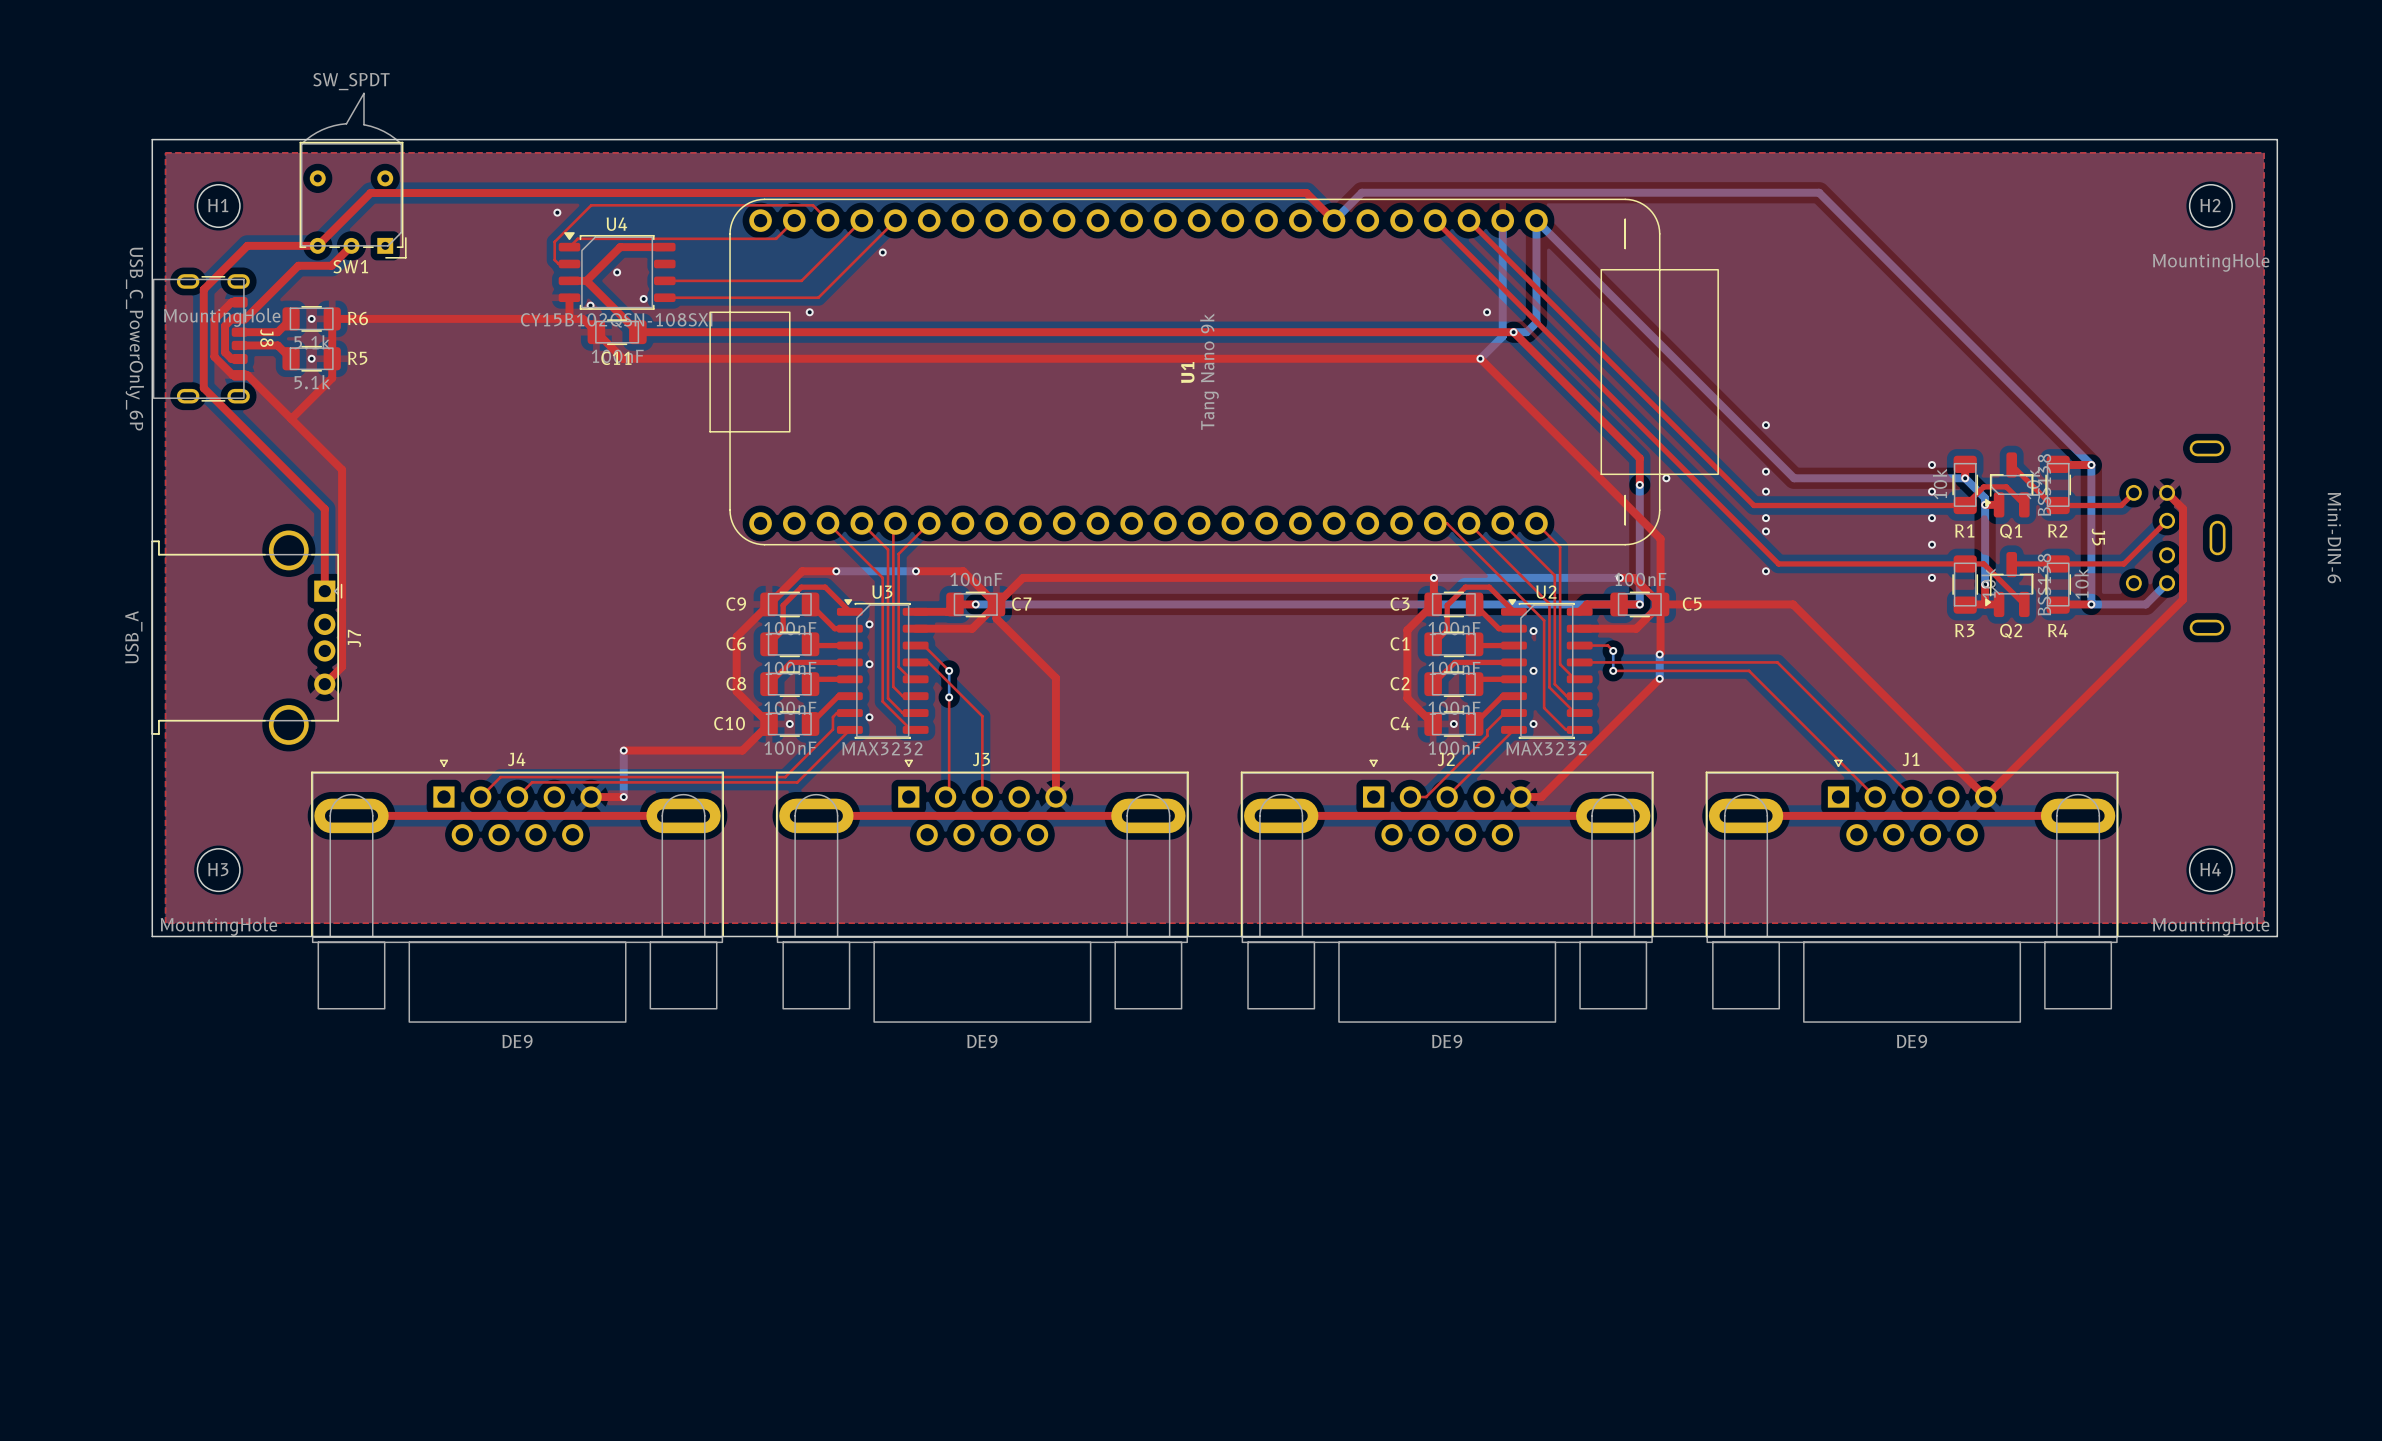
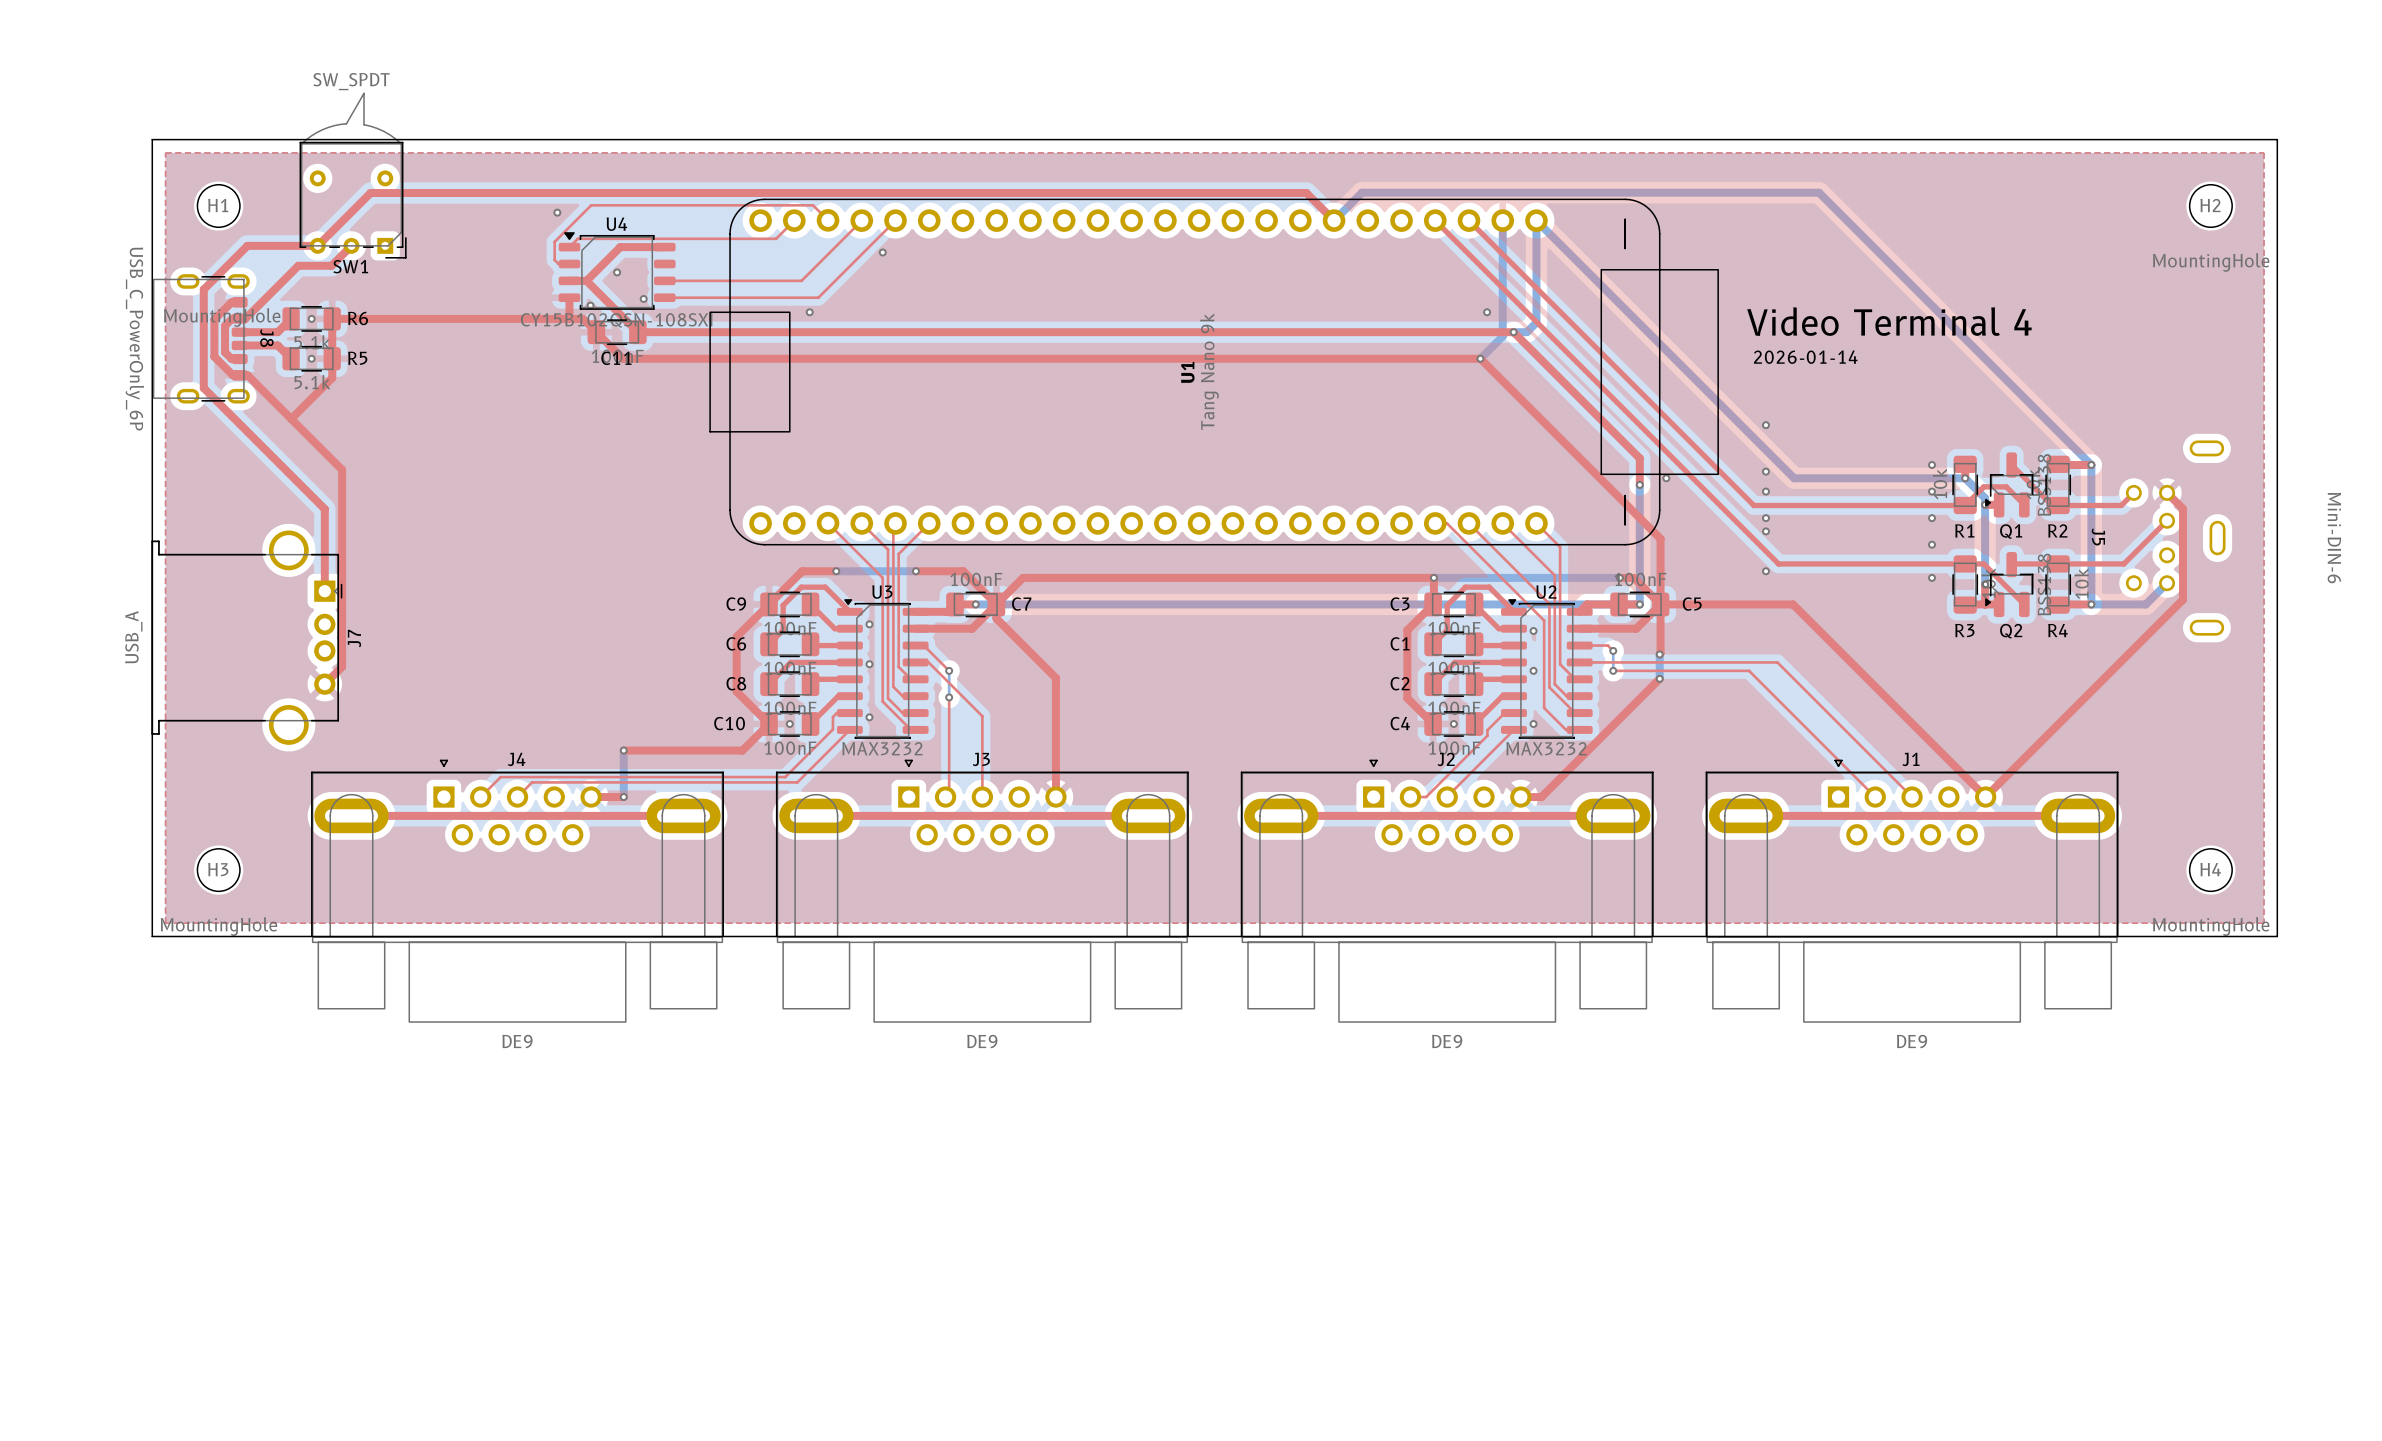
text: none -> Video Terminal 4 (1889, 321)
text: none -> 2026-01-14 (1805, 357)

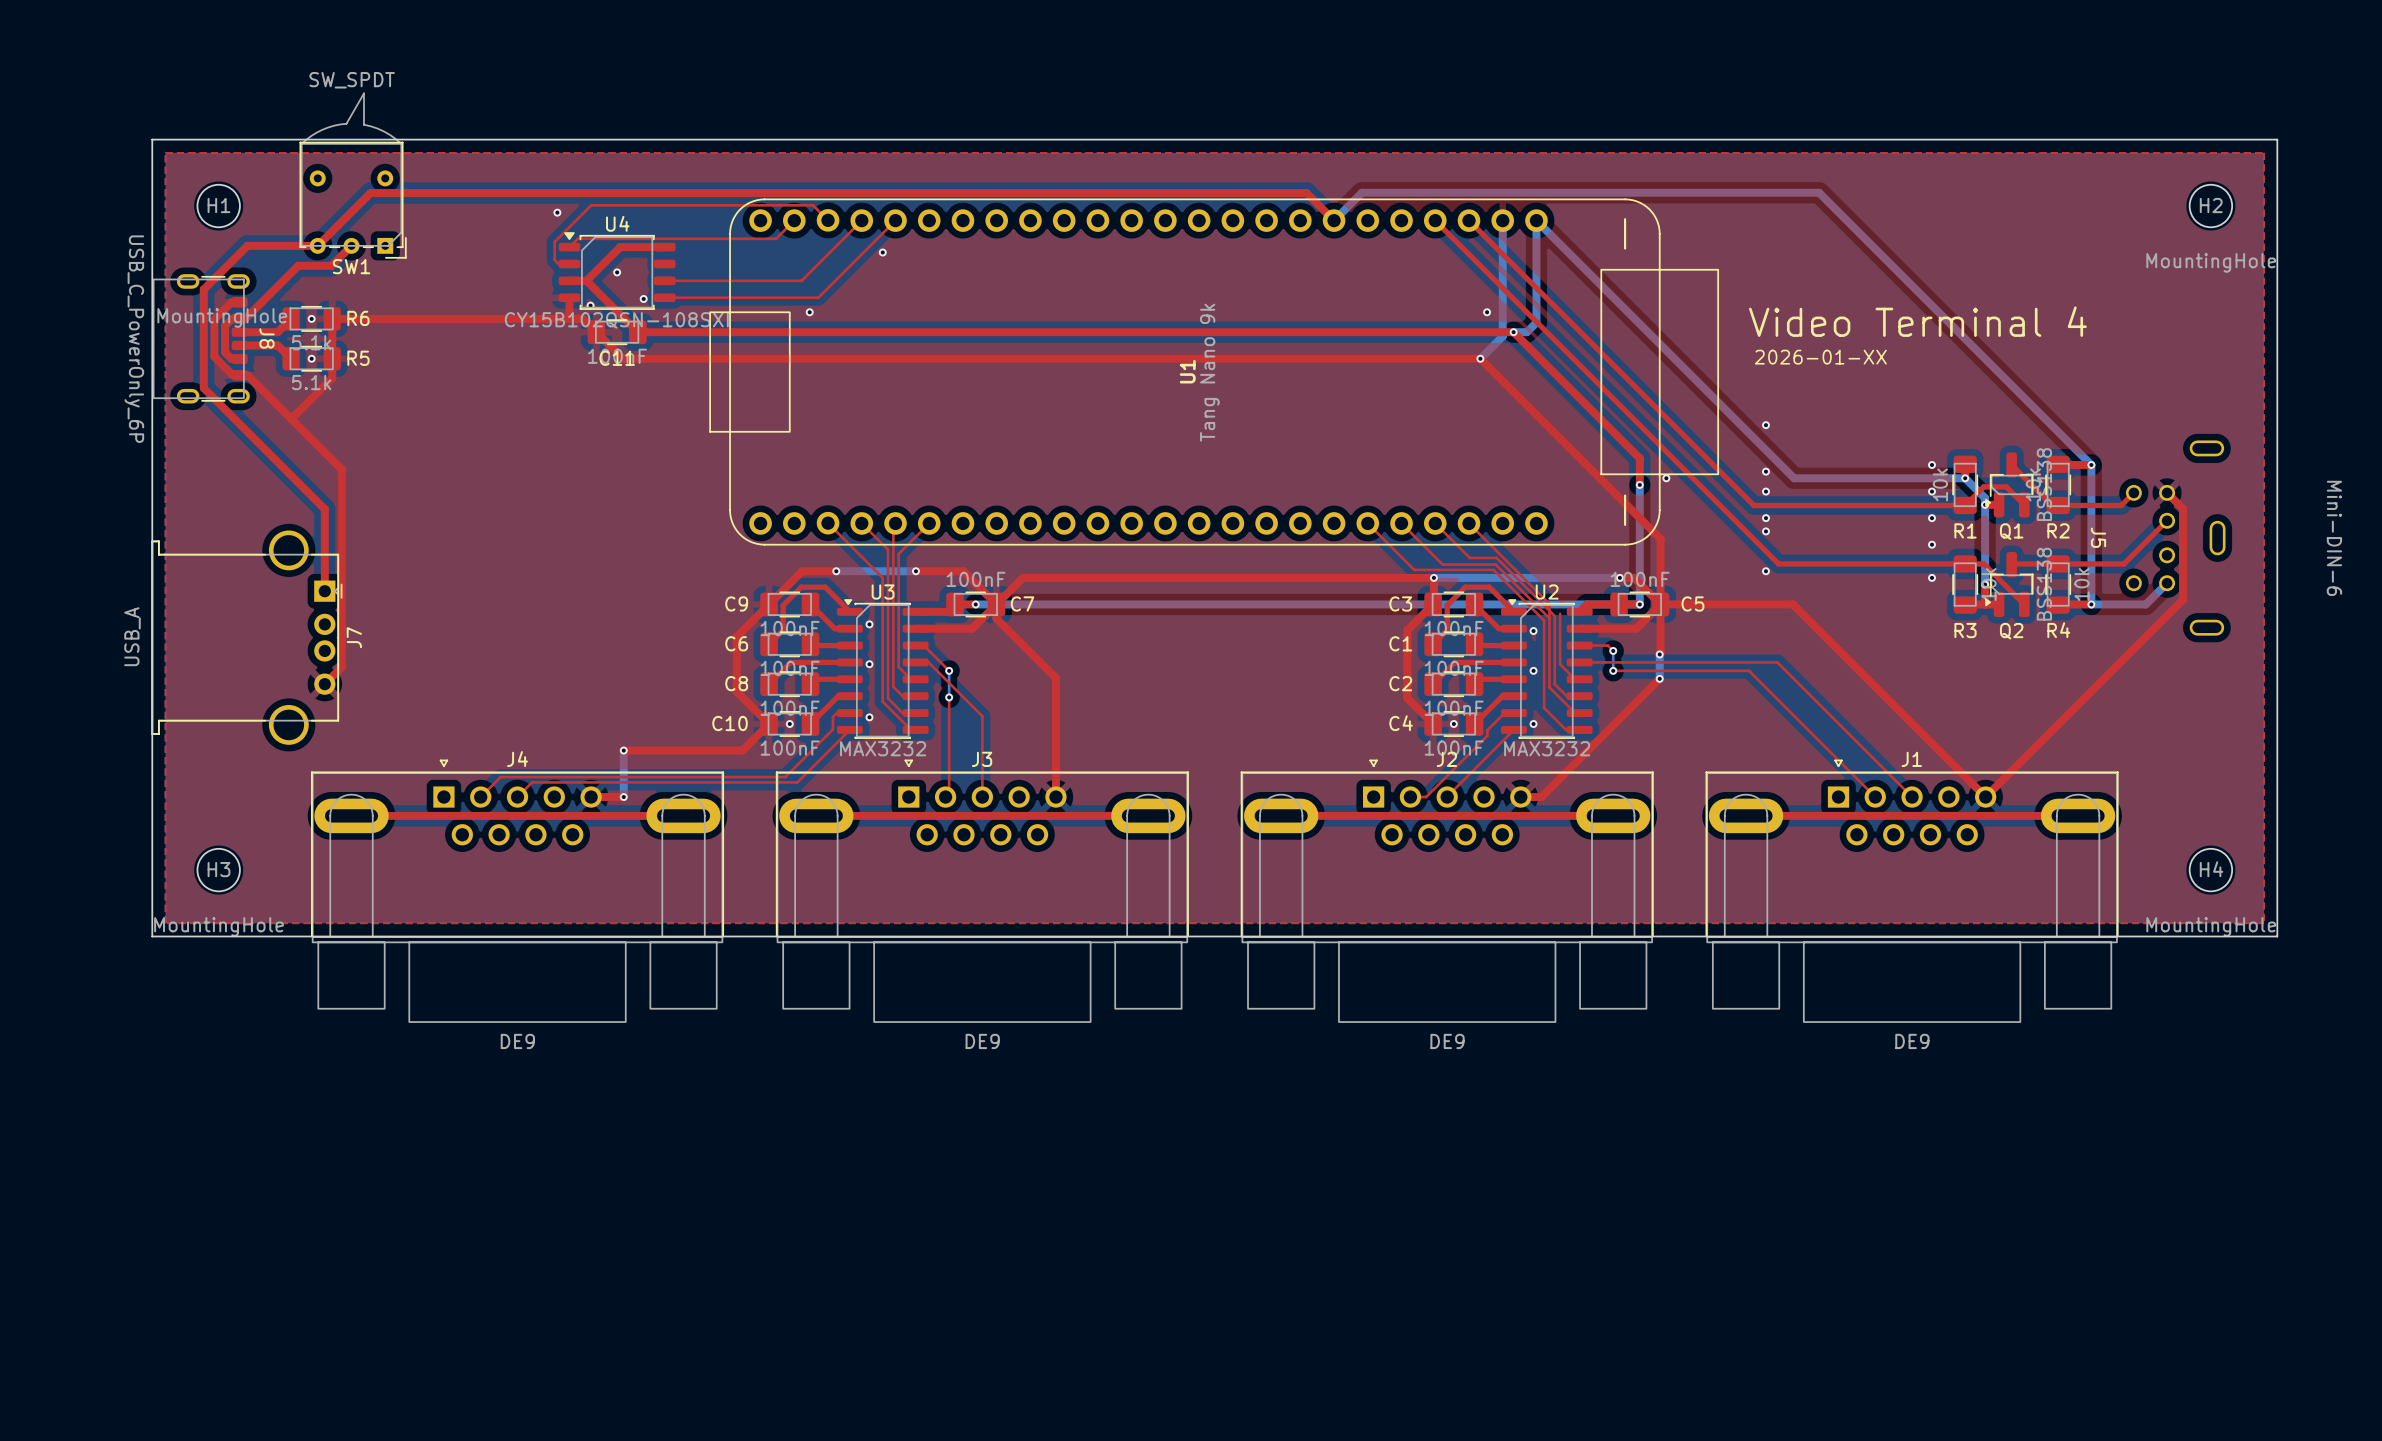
text: 2026-01-14 (1805, 357) -> 2026-01-XX (1820, 357)
top track: none -> (1401, 523) (1442, 564) (1495, 564) (1549, 618)
top track: (1435, 523) (1447, 523) (1493, 569) -> (1367, 523) (1414, 569) (1493, 569)
top track: (1502, 523) (1554, 575) (1554, 616) -> (1435, 523) (1469, 557) (1496, 557) (1554, 616)
top track: (1536, 523) (1560, 547) (1560, 613) -> none

